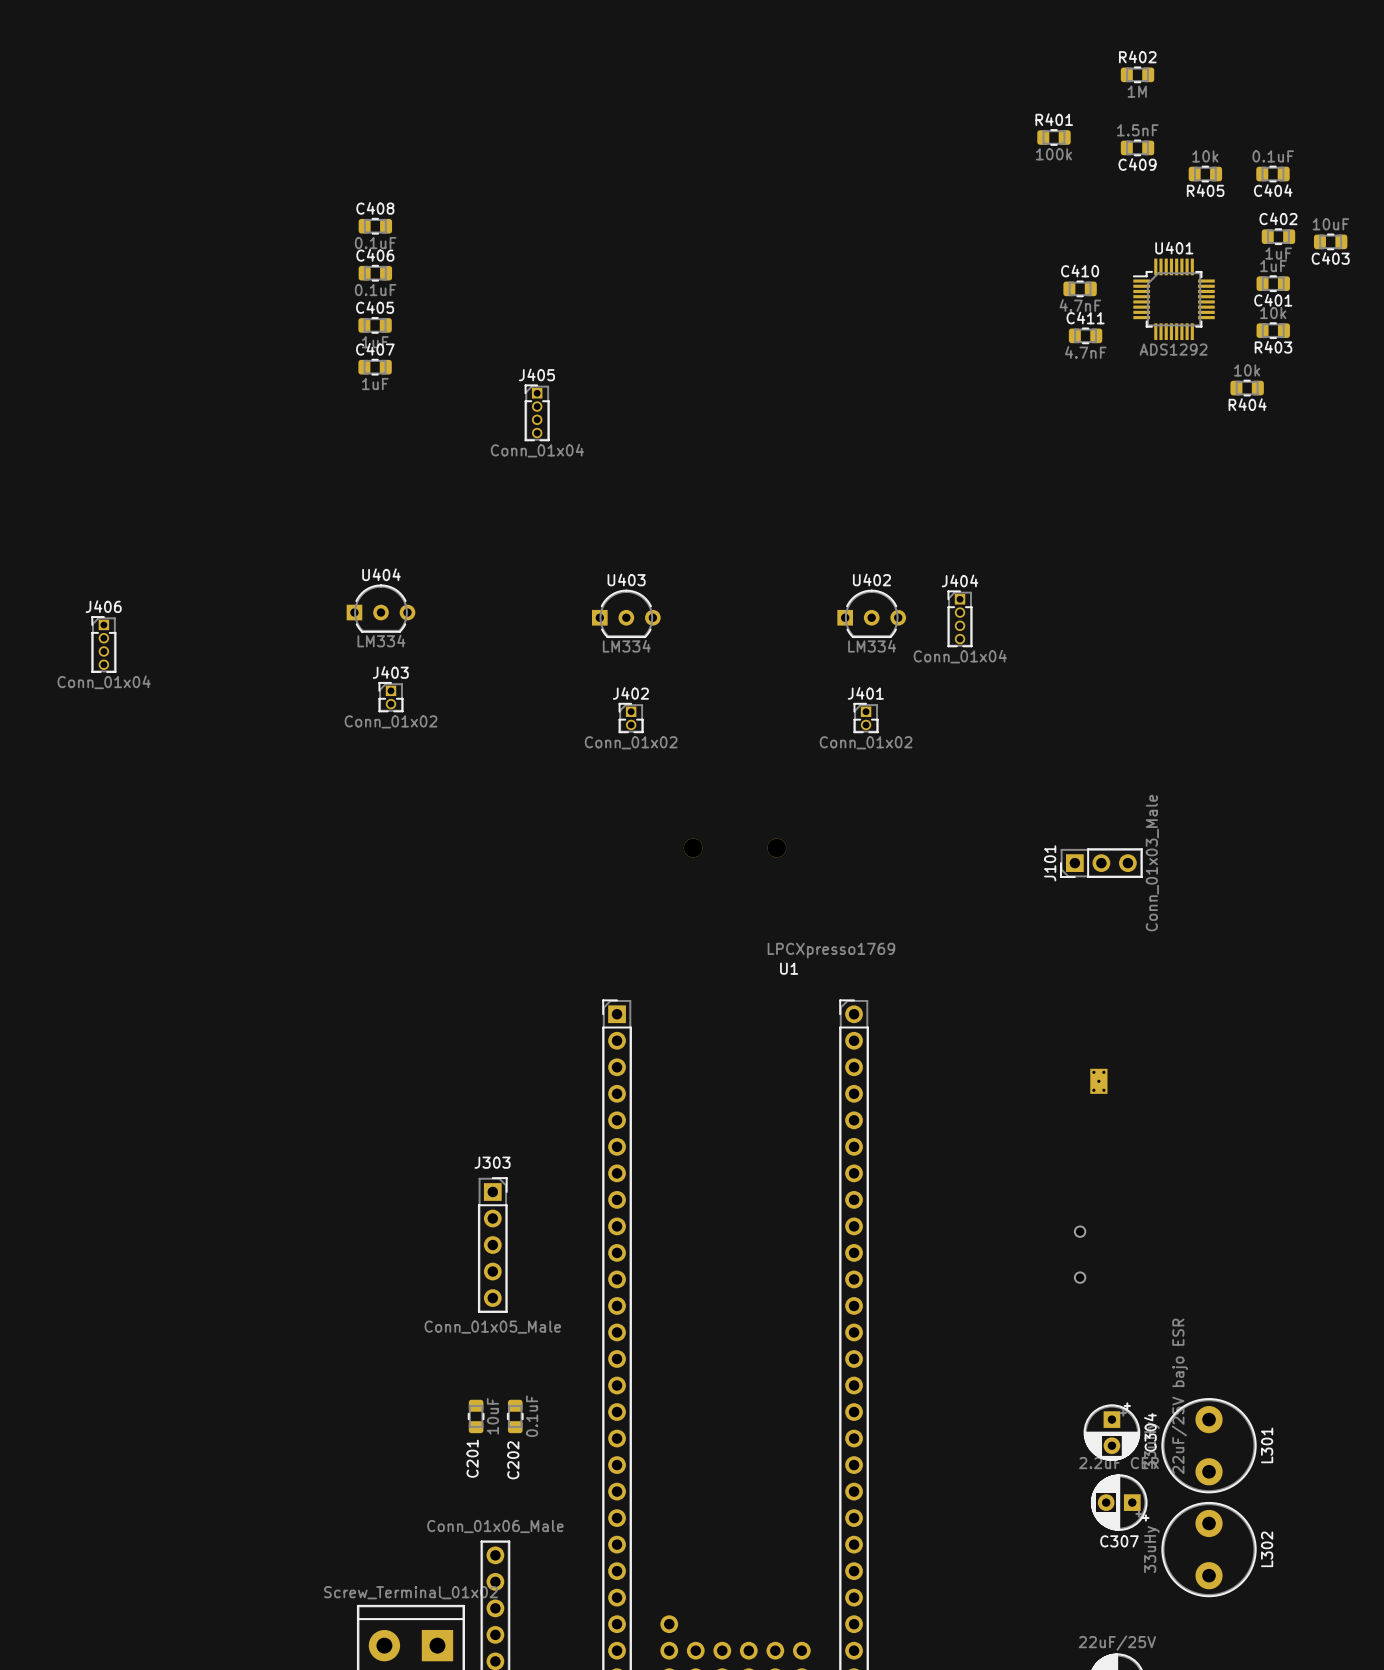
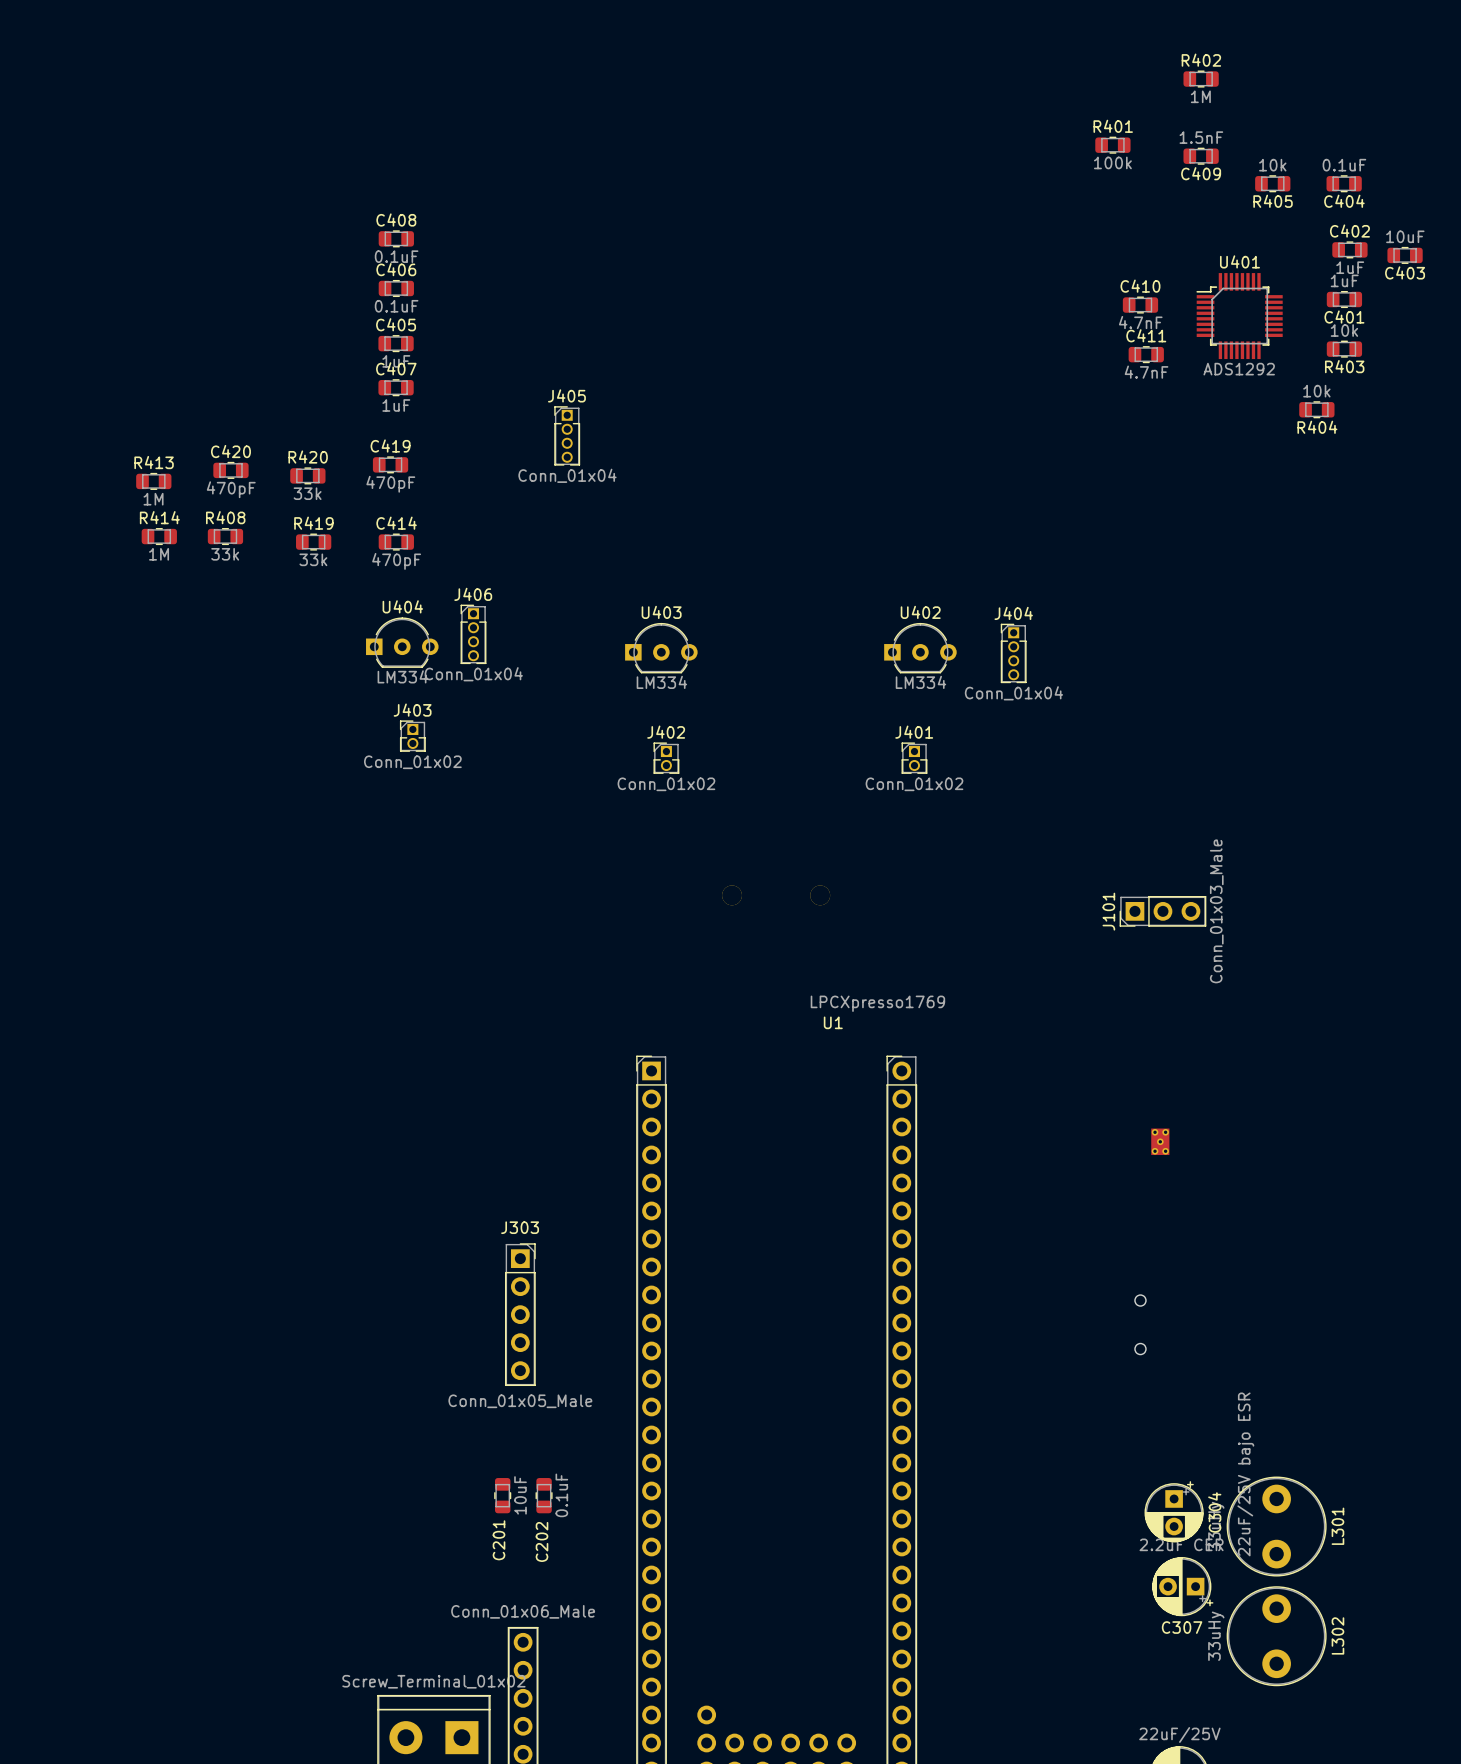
C419: none -> 470pF (390, 464)
C420: none -> 470pF (230, 470)
R420: none -> 33k (307, 475)
R413: none -> 1M (153, 481)
R414: none -> 1M (159, 536)
R408: none -> 33k (225, 536)
R419: none -> 33k (313, 542)
C414: none -> 470pF (396, 542)
J406 position: (103, 644) -> (473, 634)

